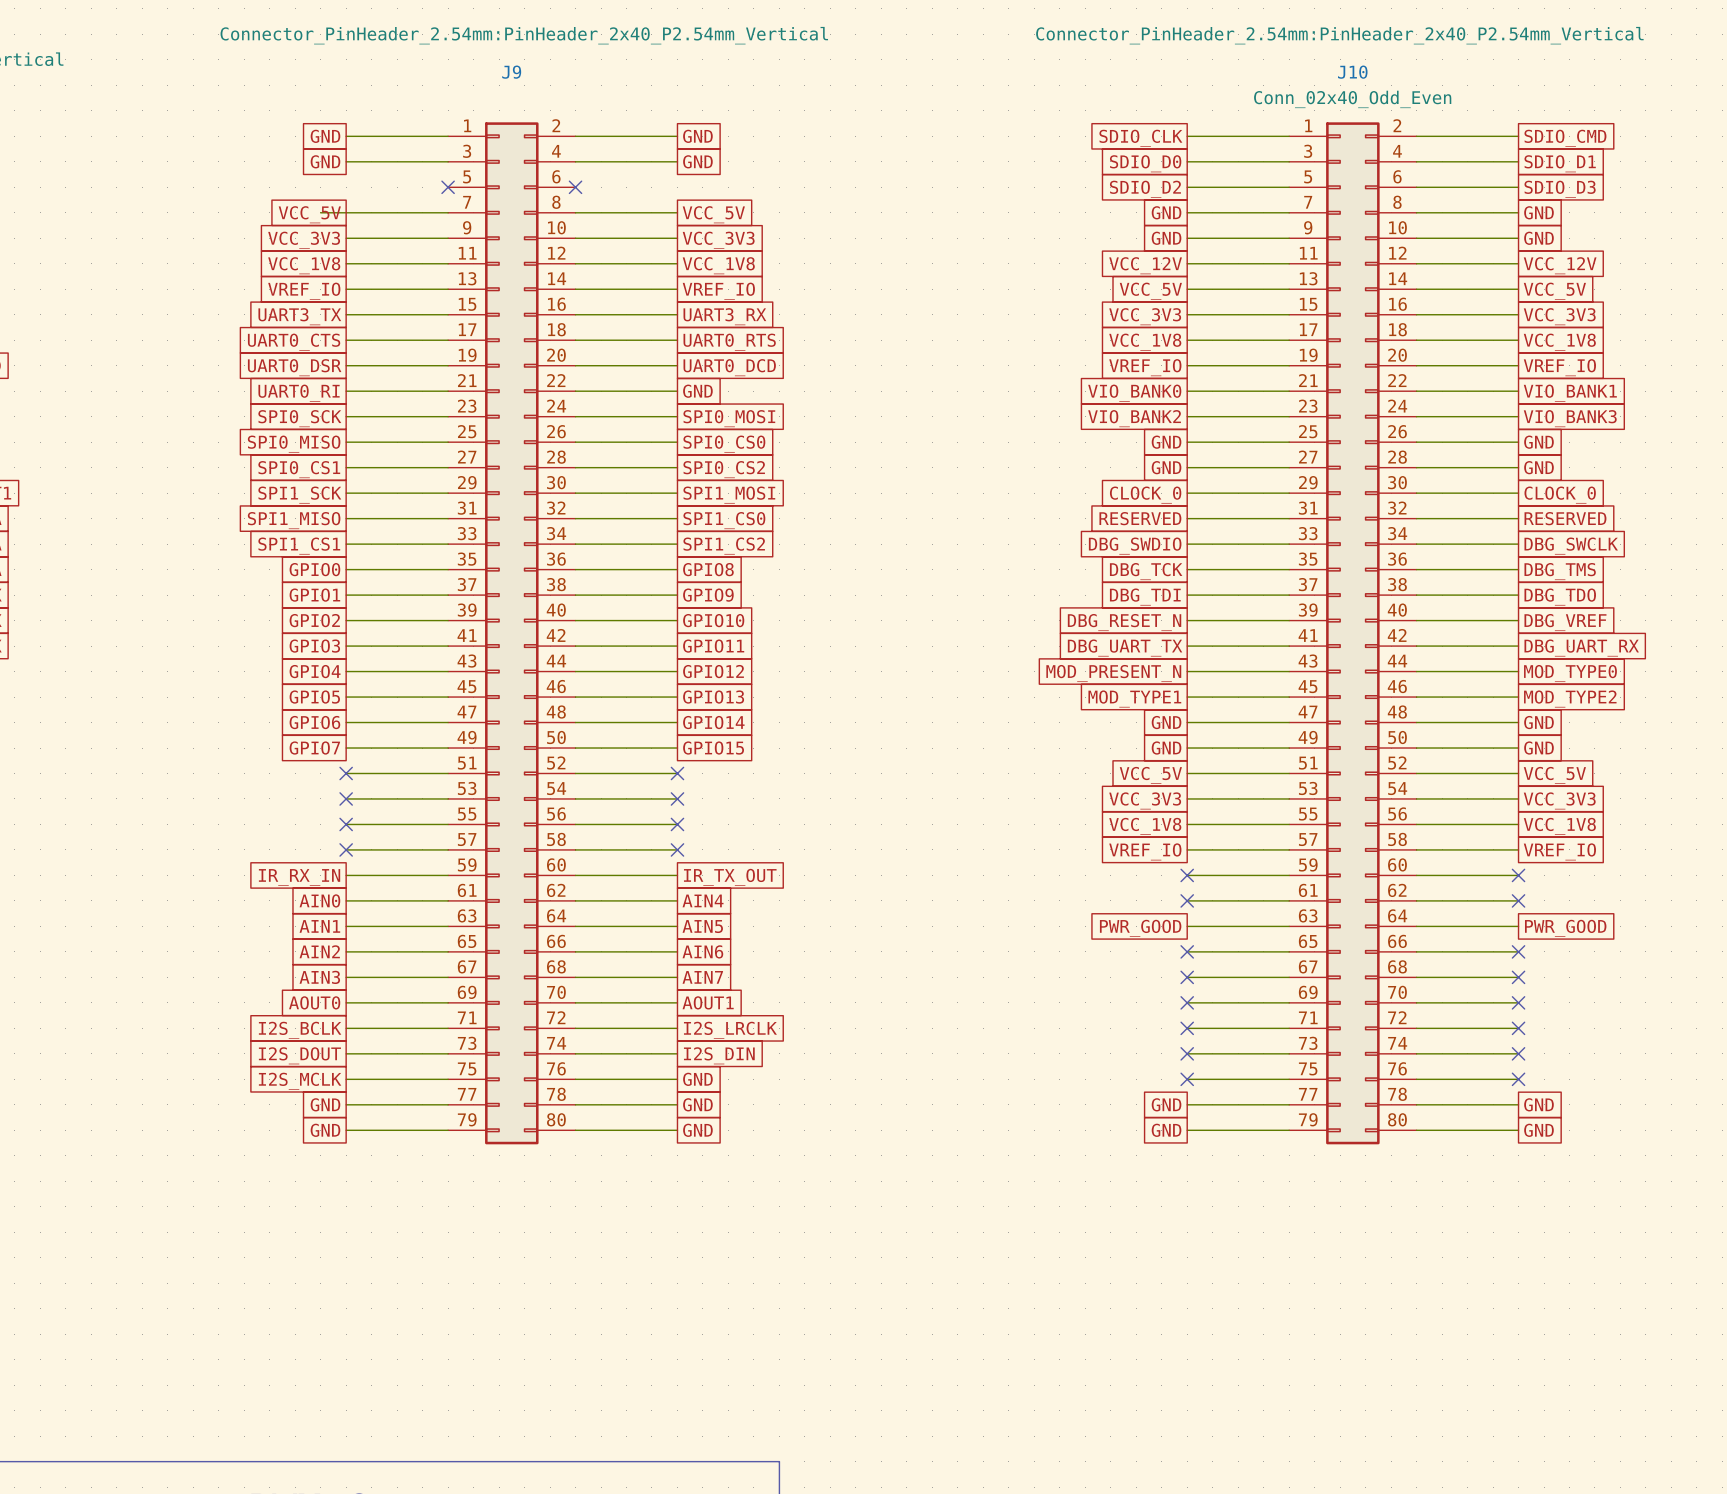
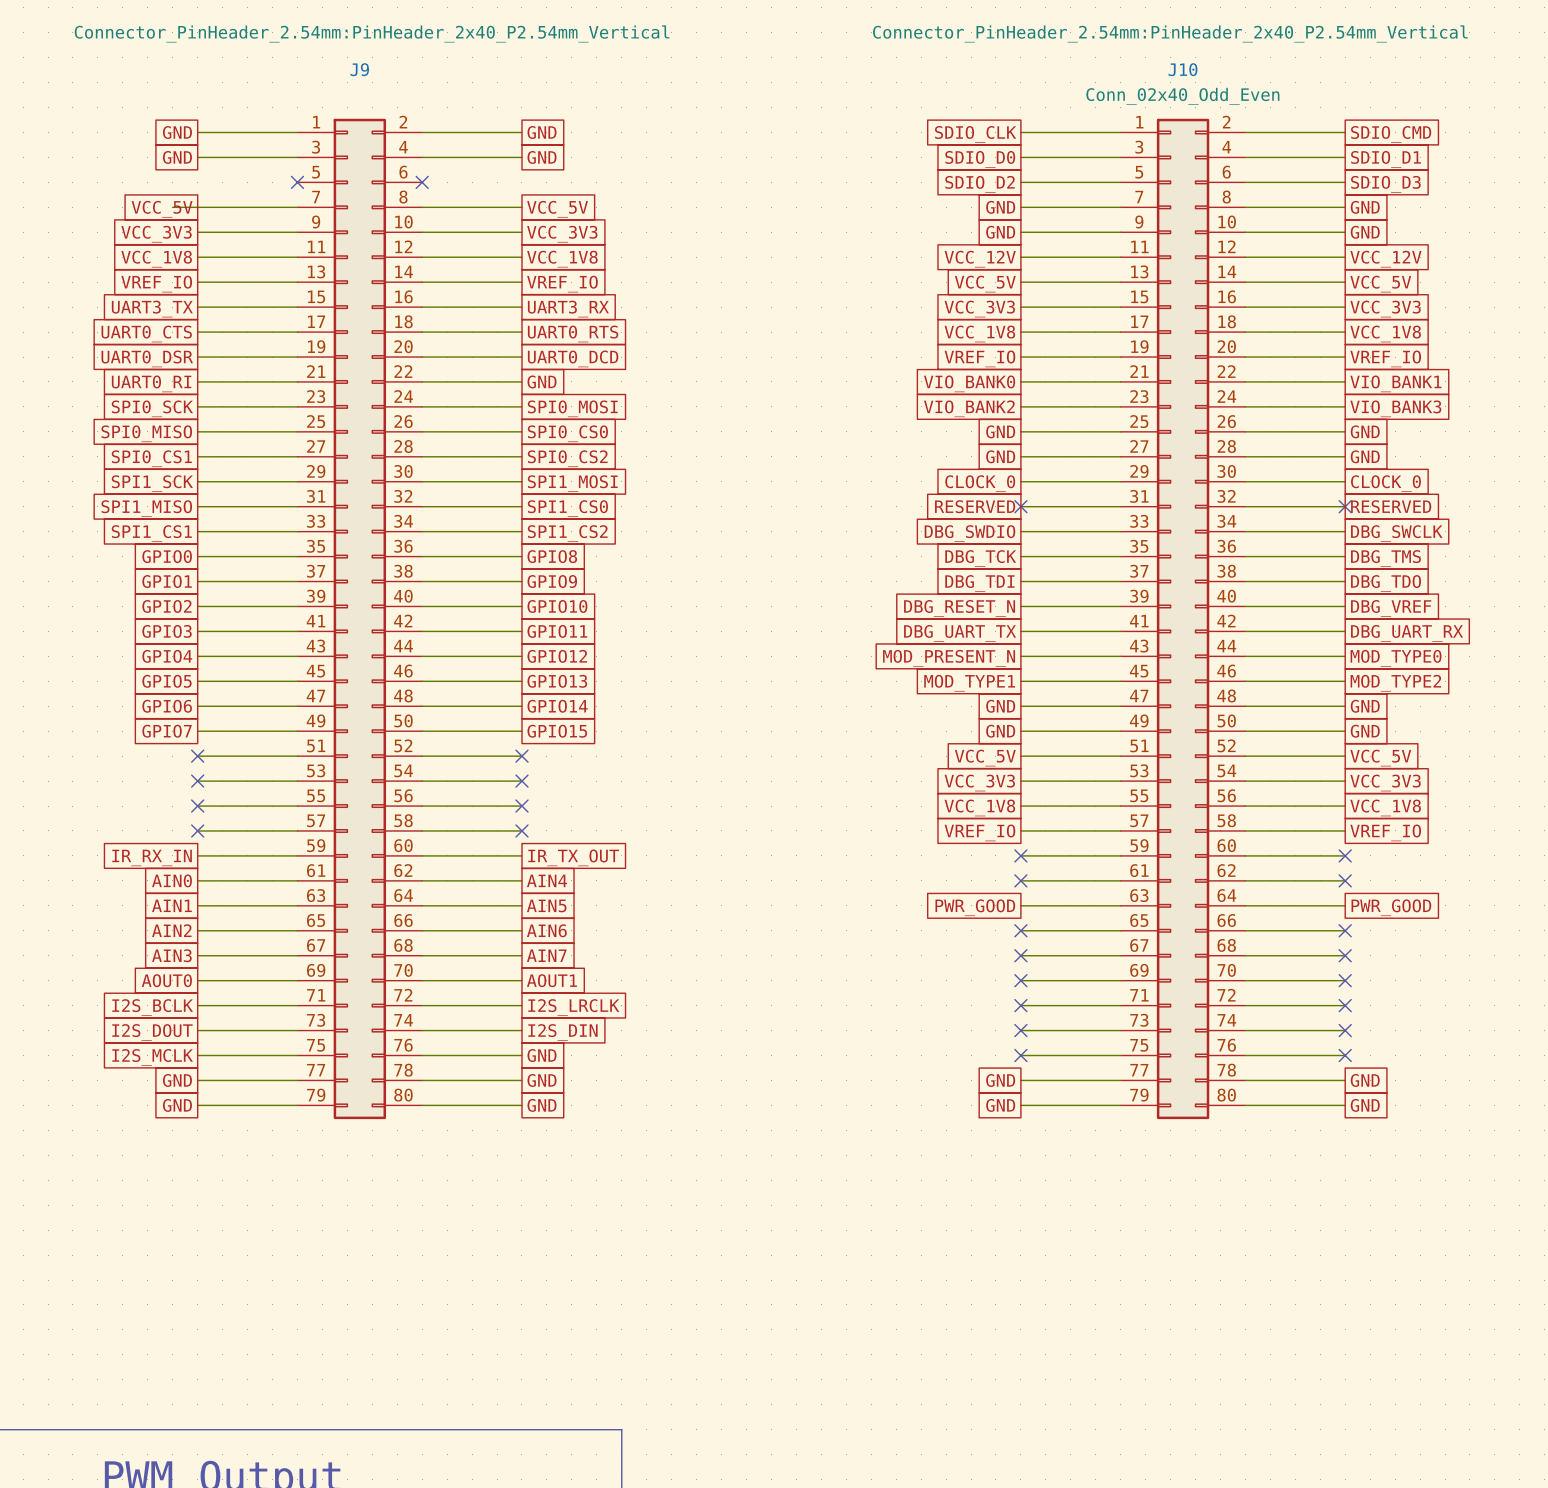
no-connect mark: none -> (1020, 506)
no-connect mark: none -> (1345, 506)

